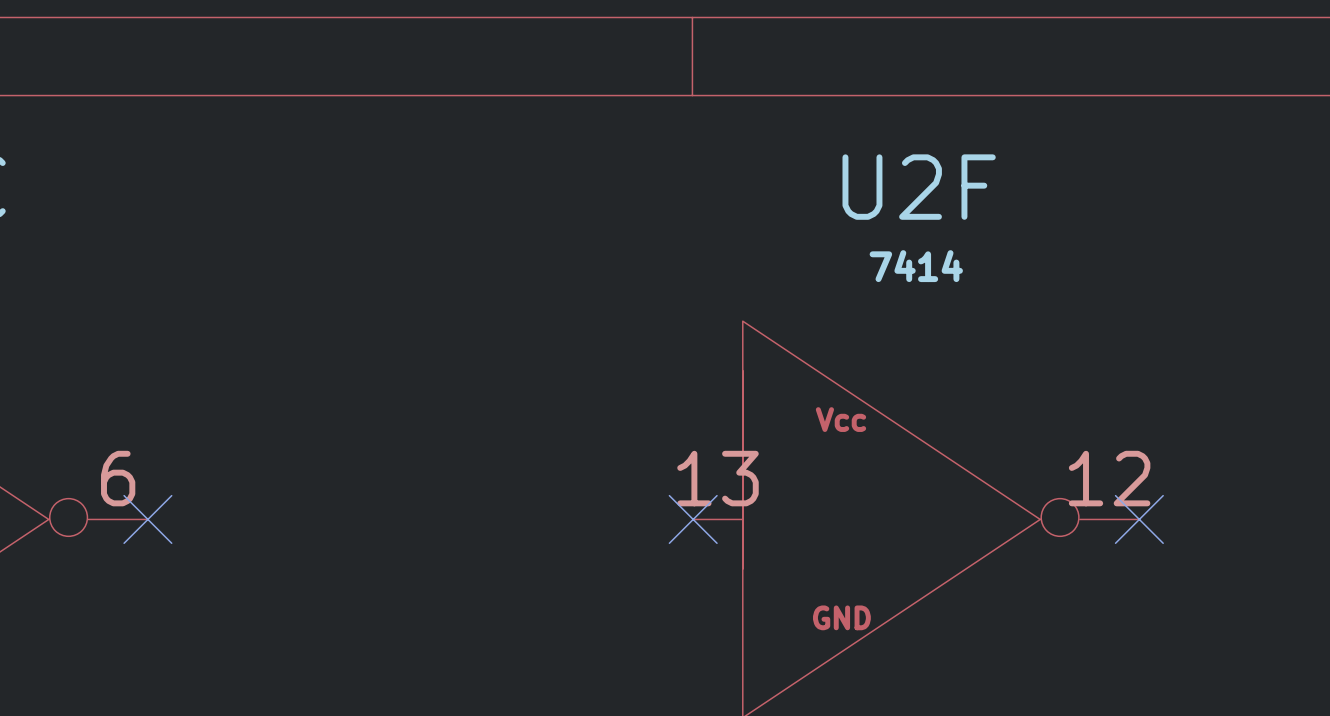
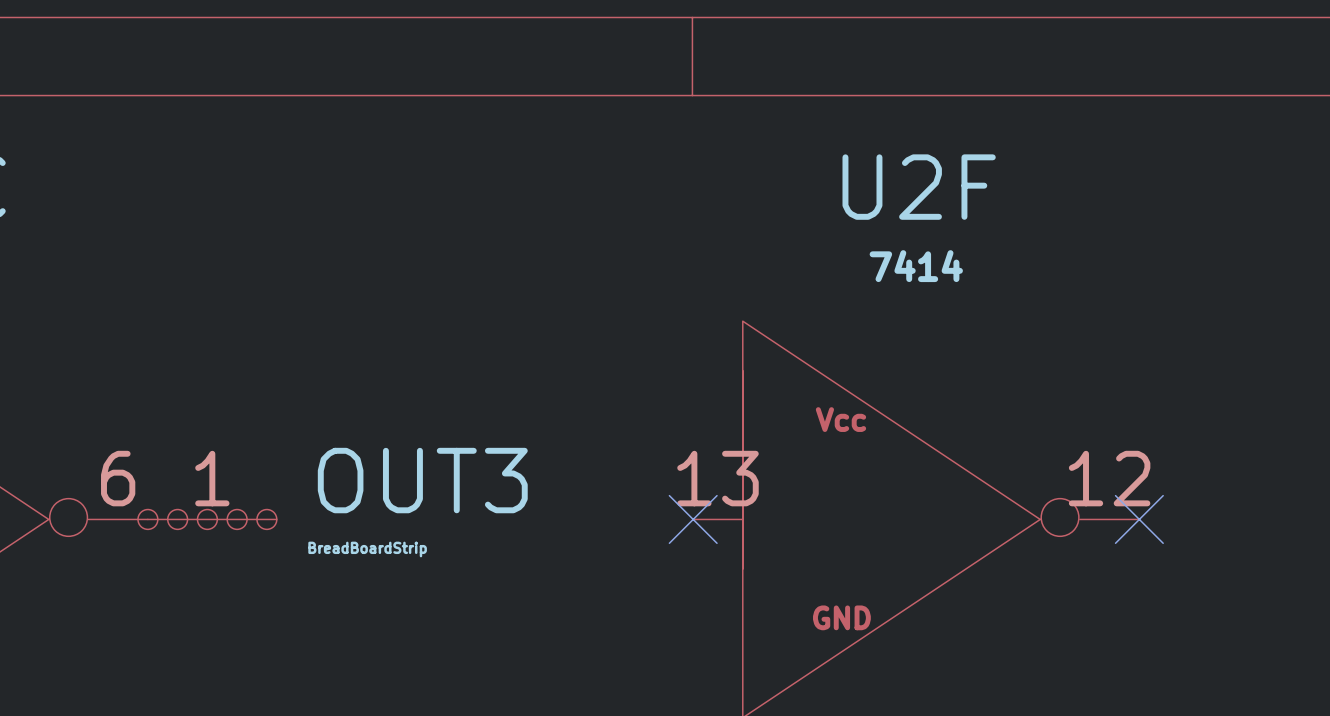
no-connect mark: (147, 519) -> none
OUT3: none -> BreadBoardStrip (207, 519)

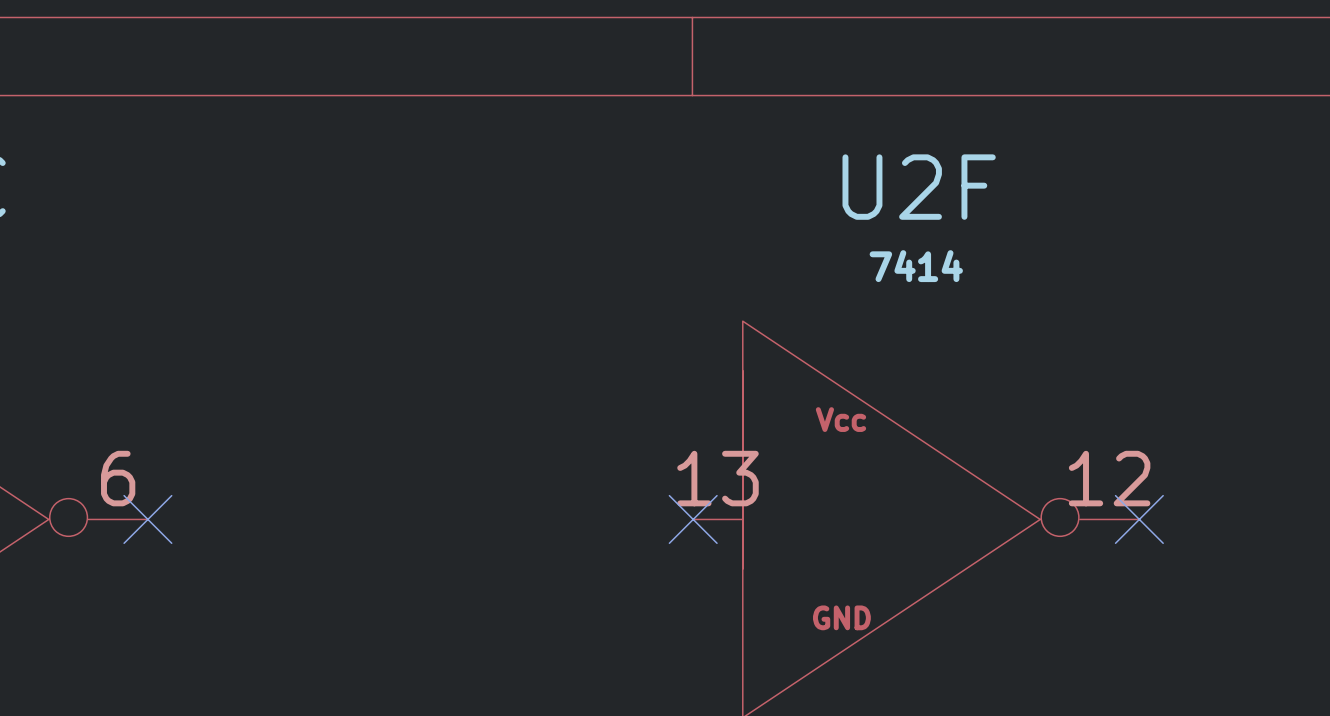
no-connect mark: none -> (147, 519)
OUT3: BreadBoardStrip (207, 519) -> none

